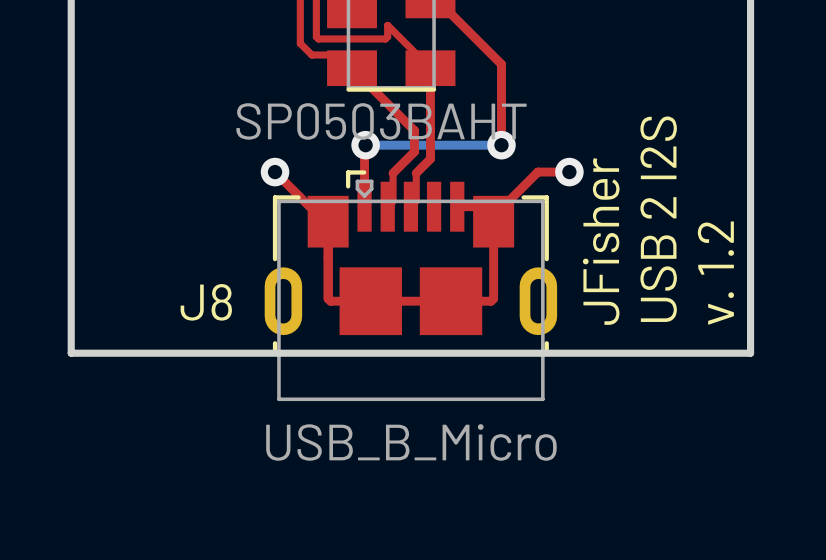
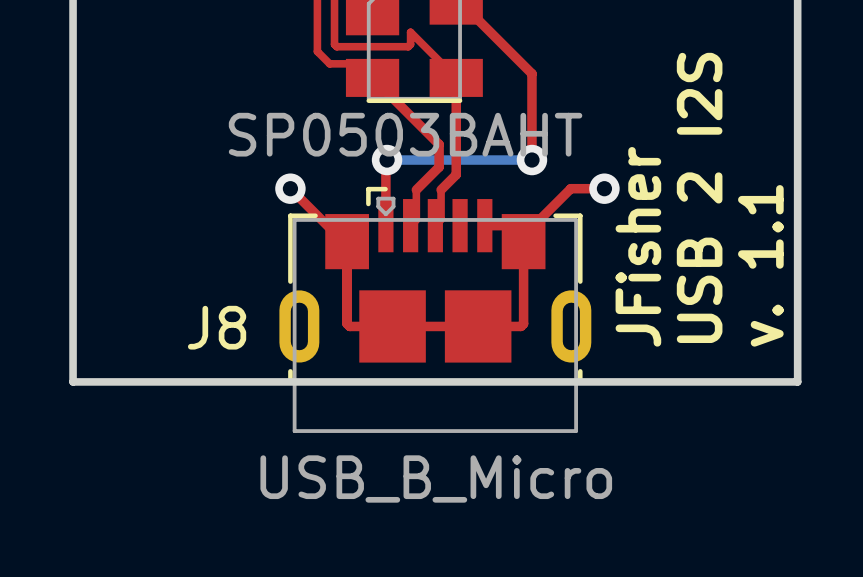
text: v. 1.2 (715, 273) -> v. 1.1 (760, 265)

